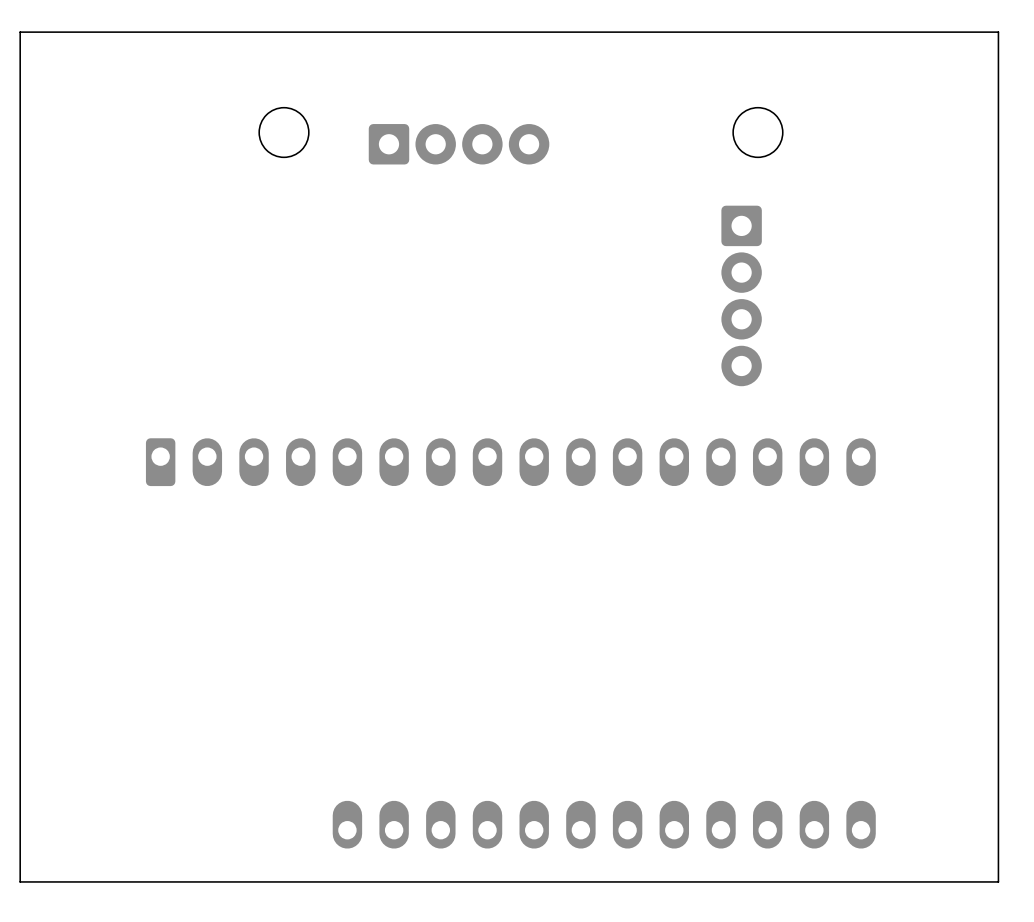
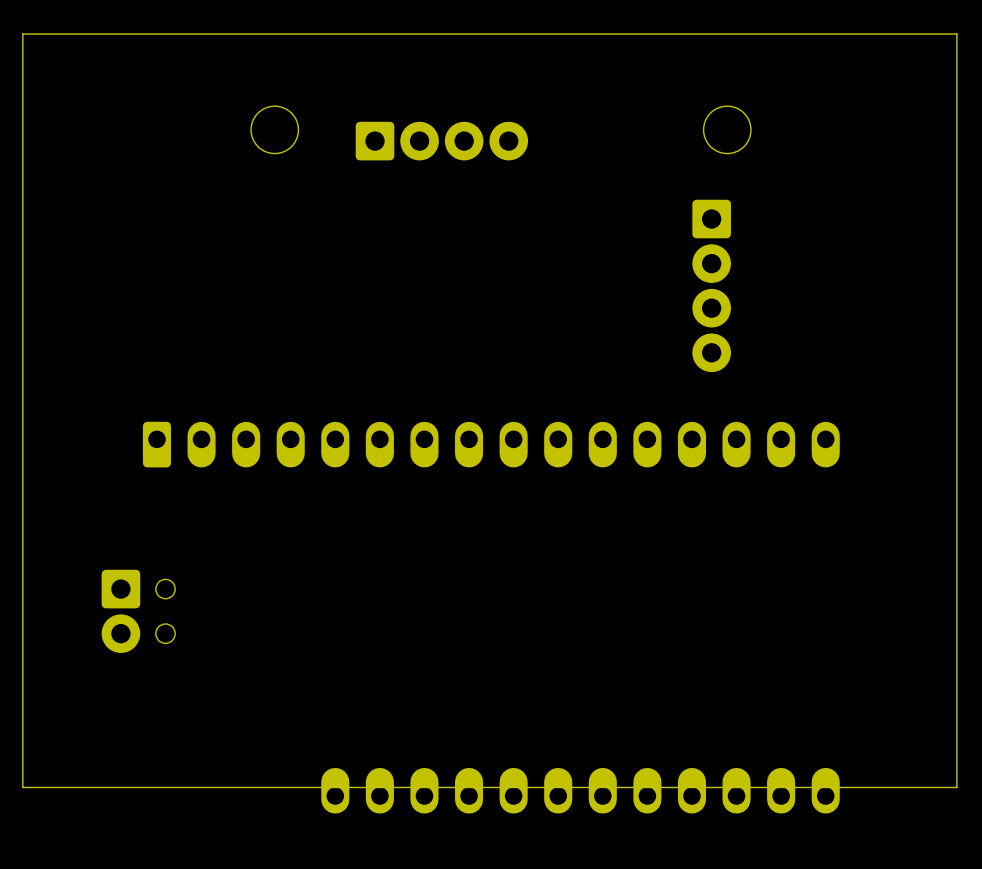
part: none -> (138, 611)
board edge: (998, 821) (998, 881) (20, 881) (20, 821) -> (956, 787) (22, 787)

